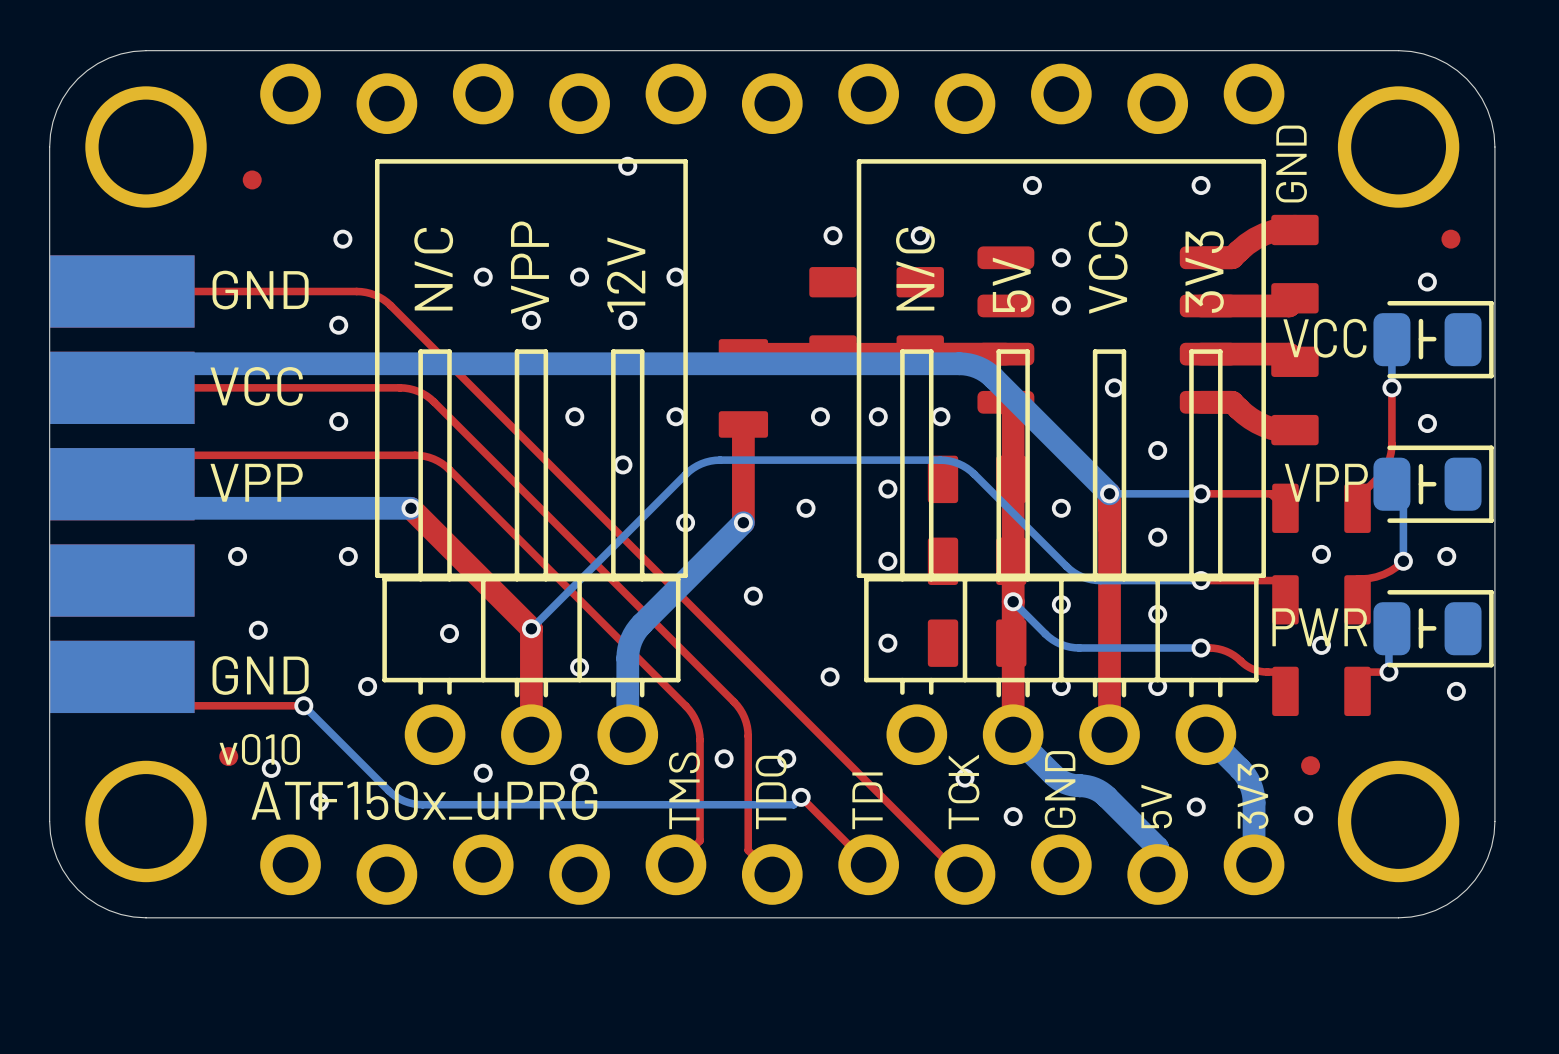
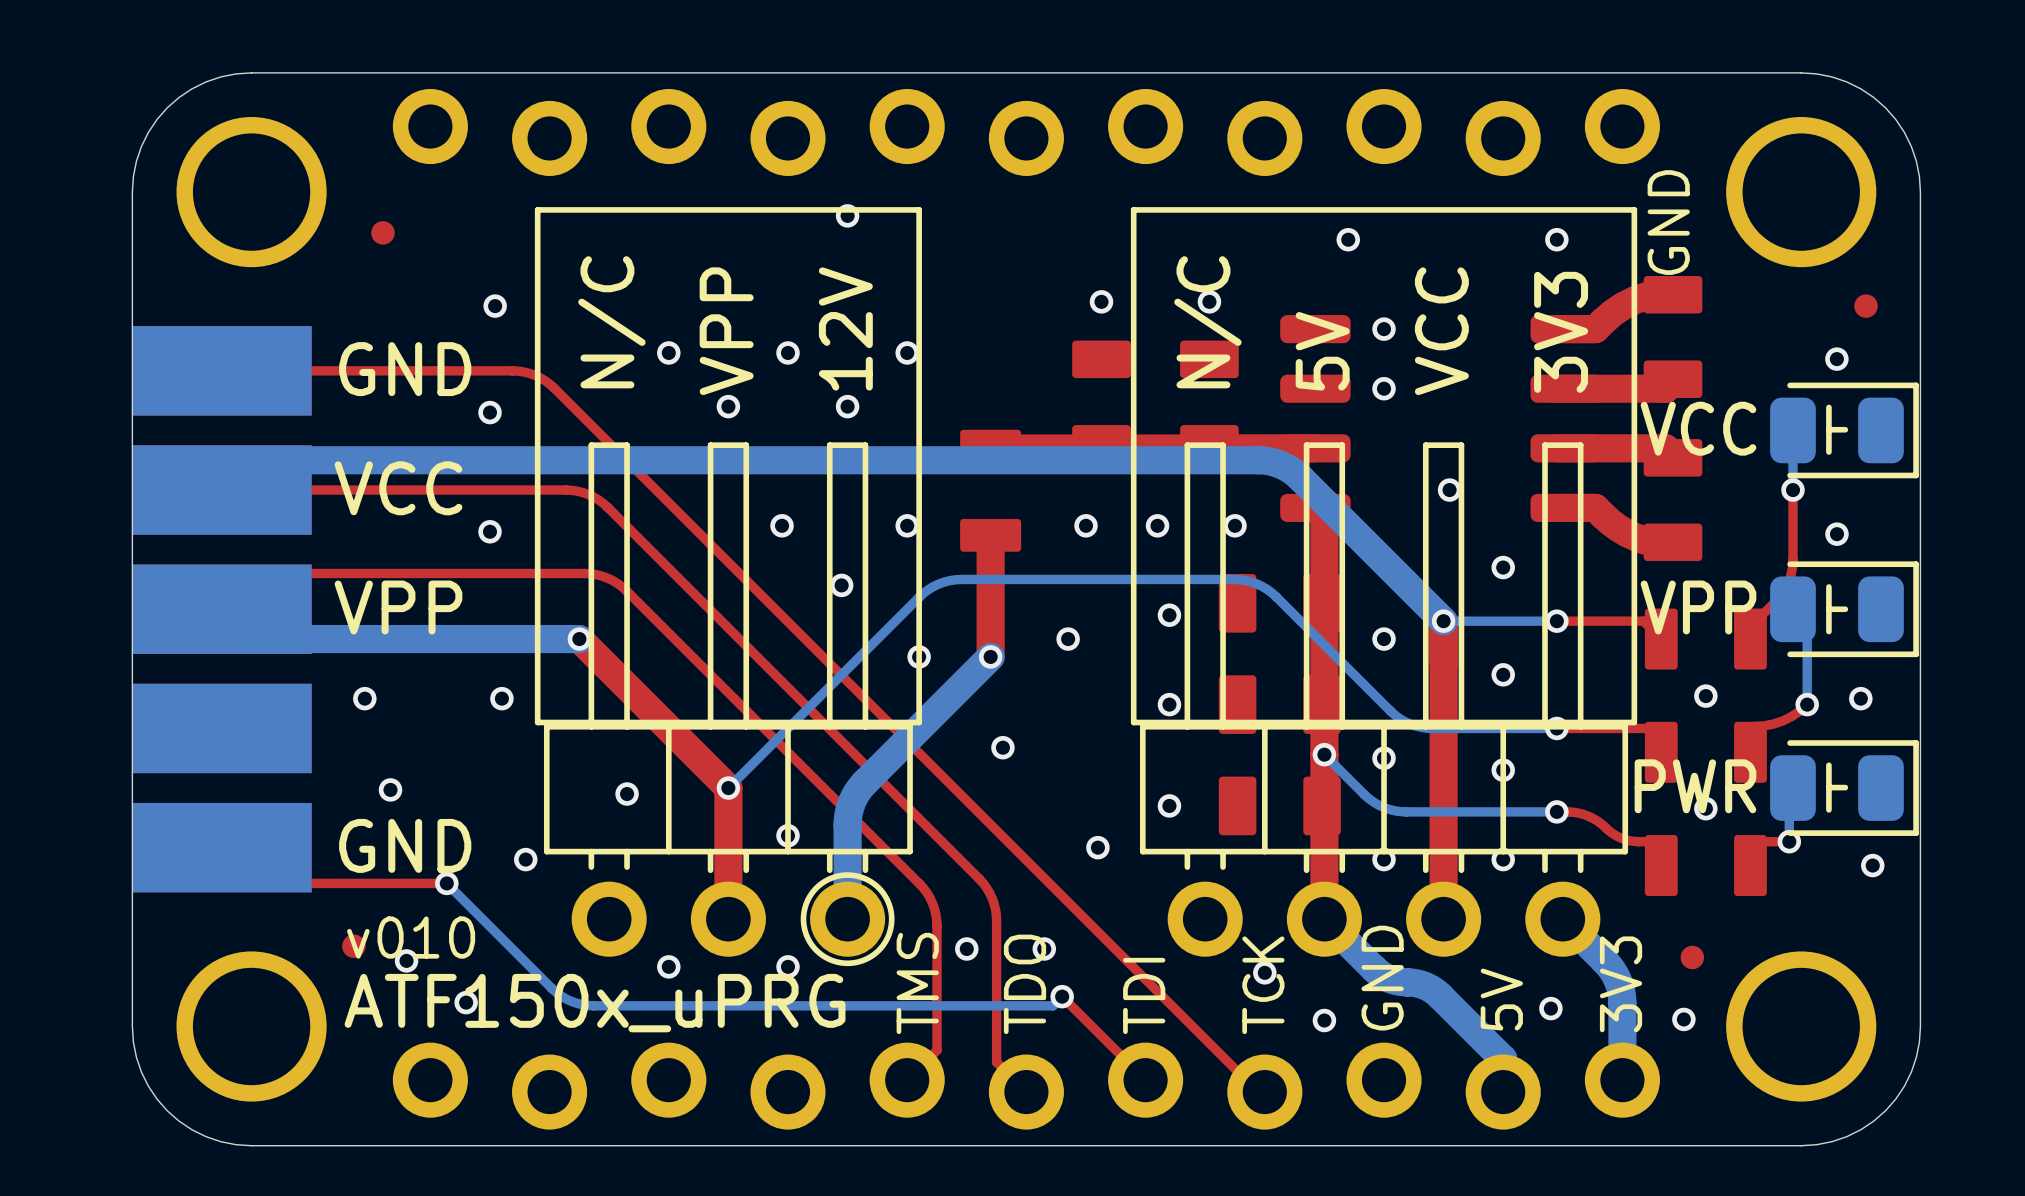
drawing: none -> [800, 872, 895, 967]

